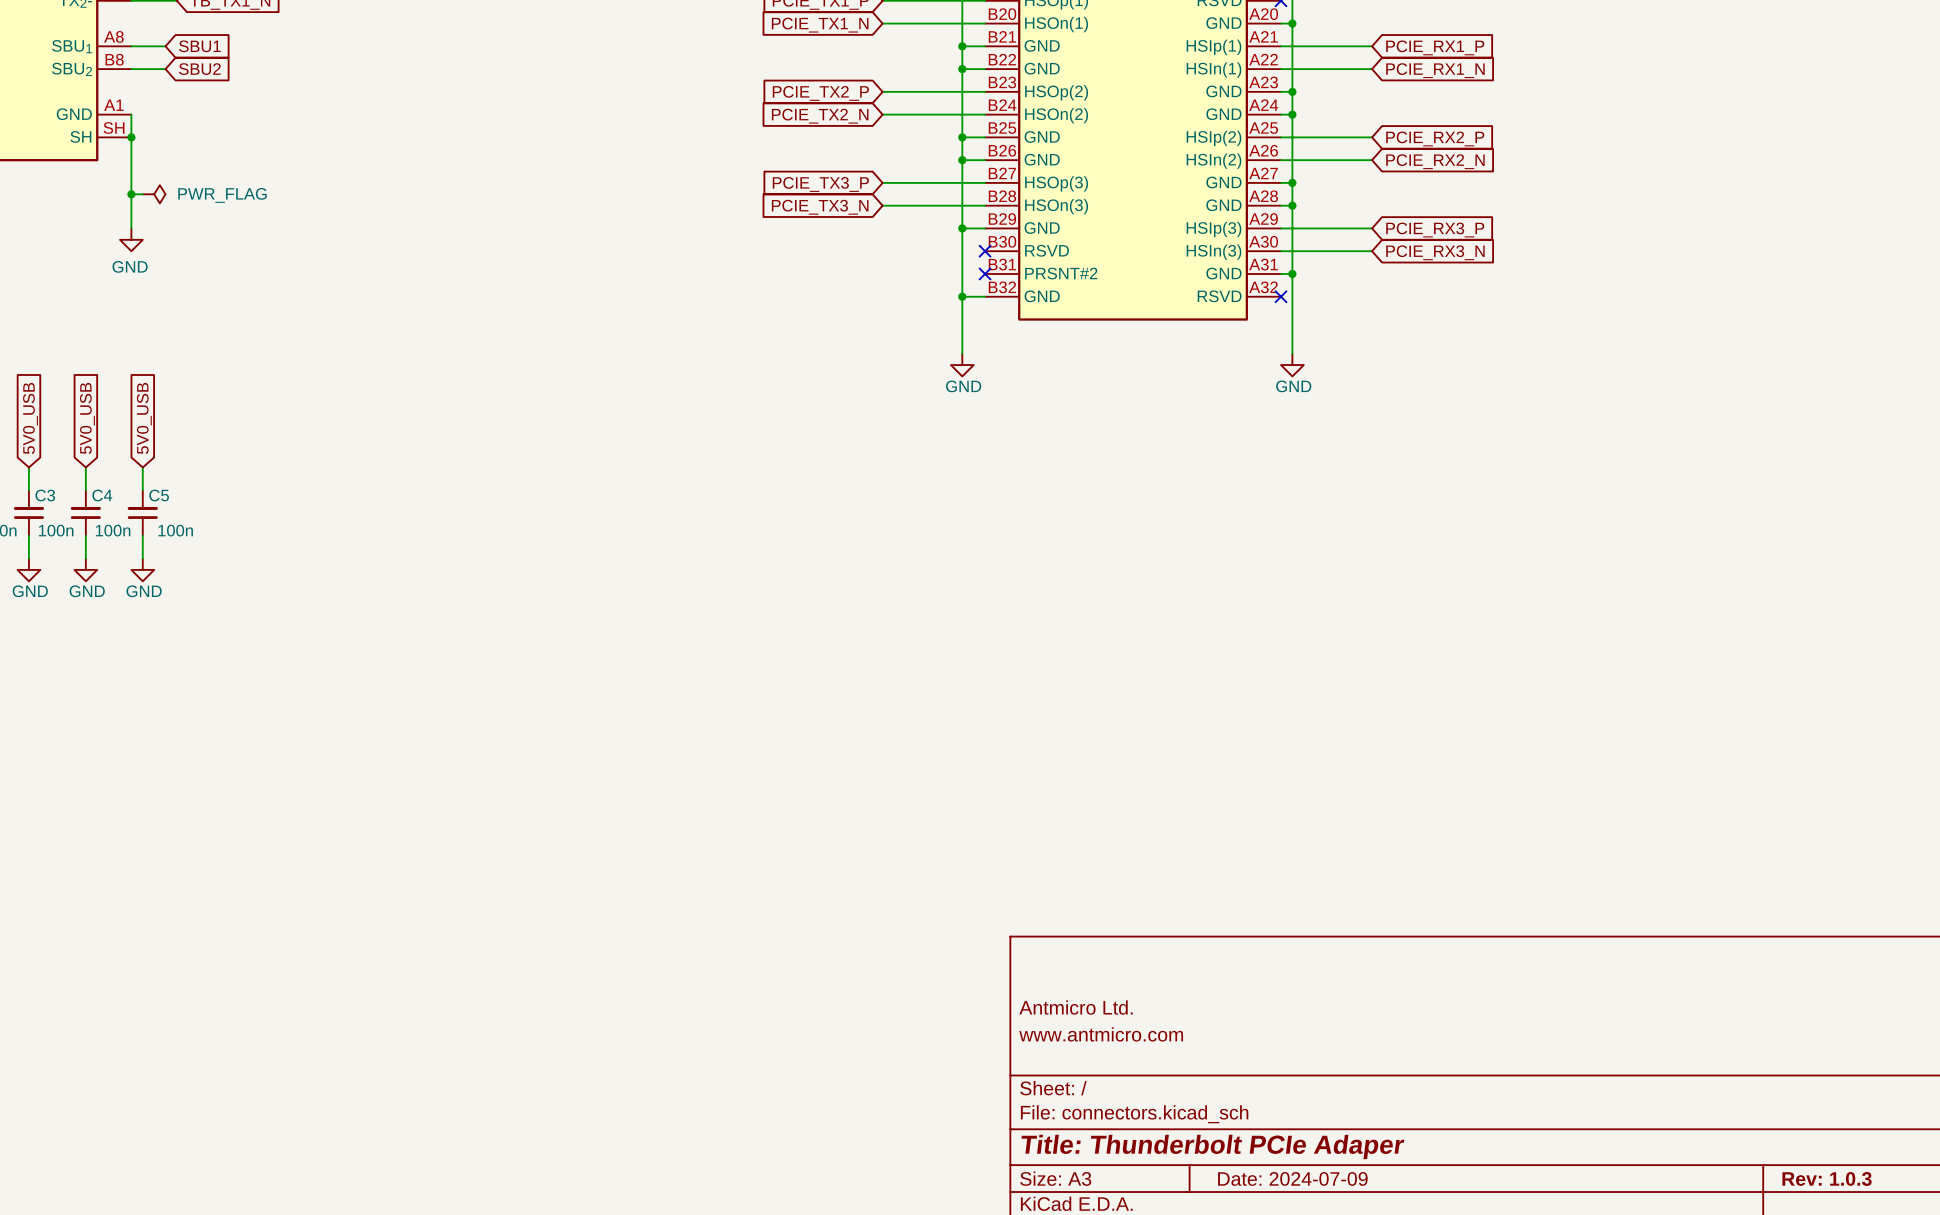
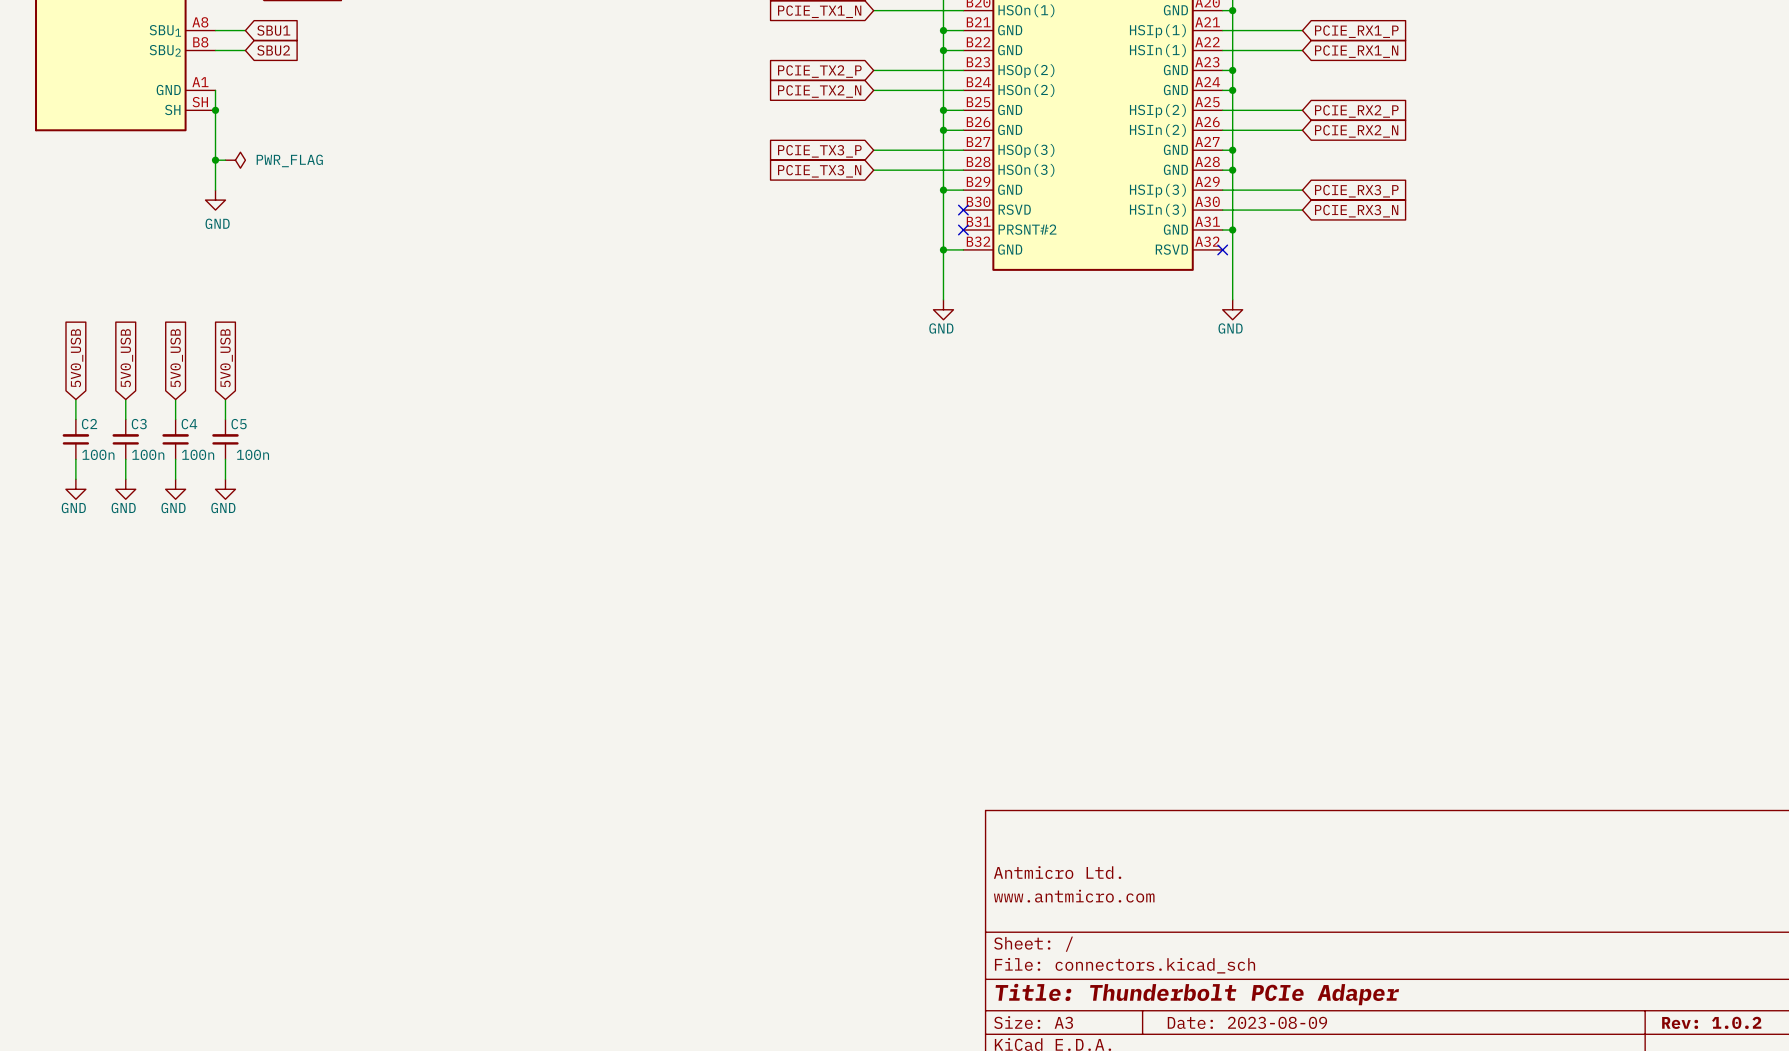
title block: Date: 2024-07-09 (1292, 1178) -> Date: 2023-08-09 (1247, 1022)
title block: Rev: 1.0.3 (1827, 1178) -> Rev: 1.0.2 (1711, 1022)

